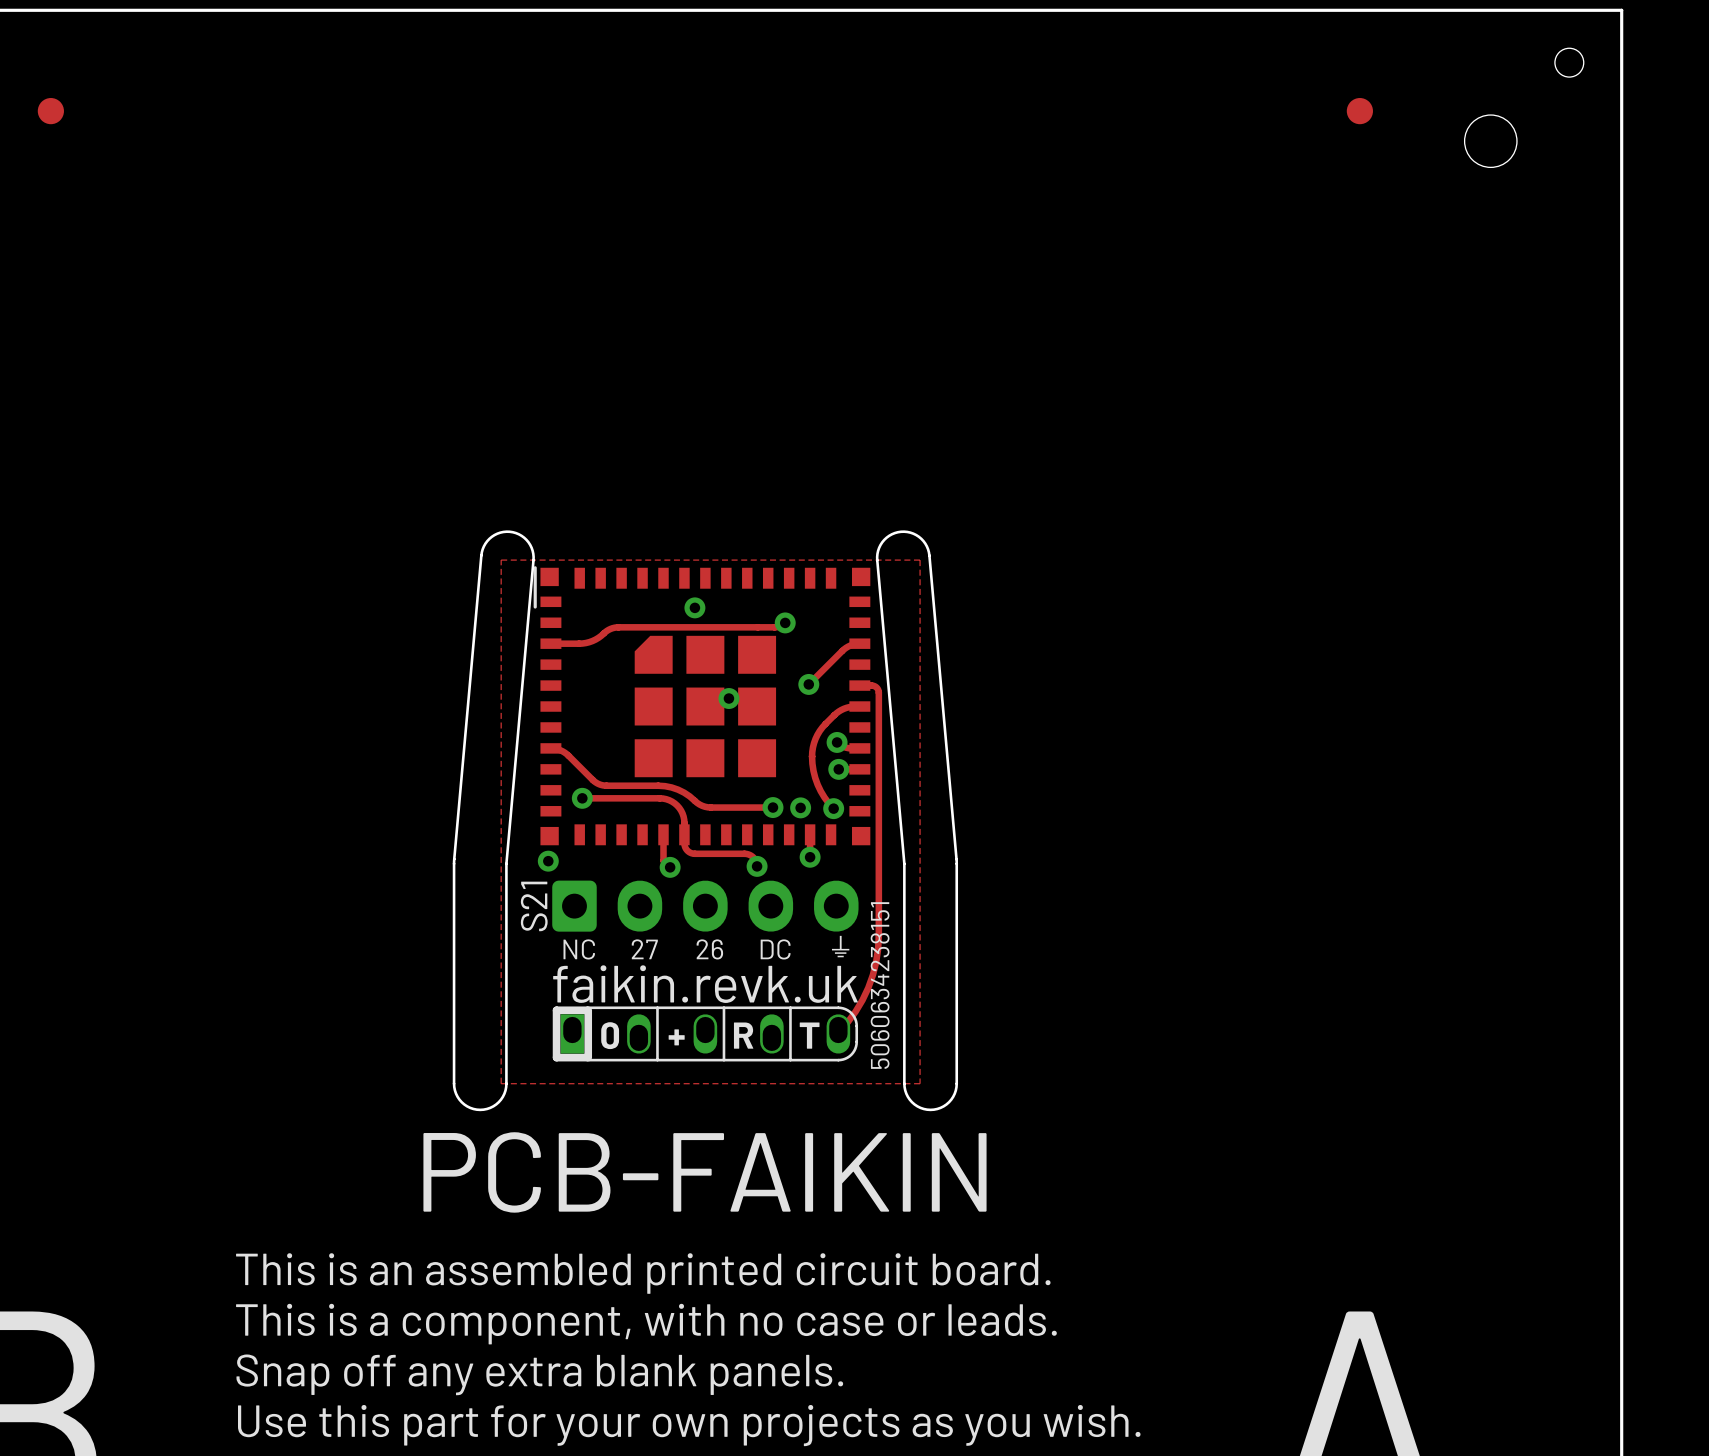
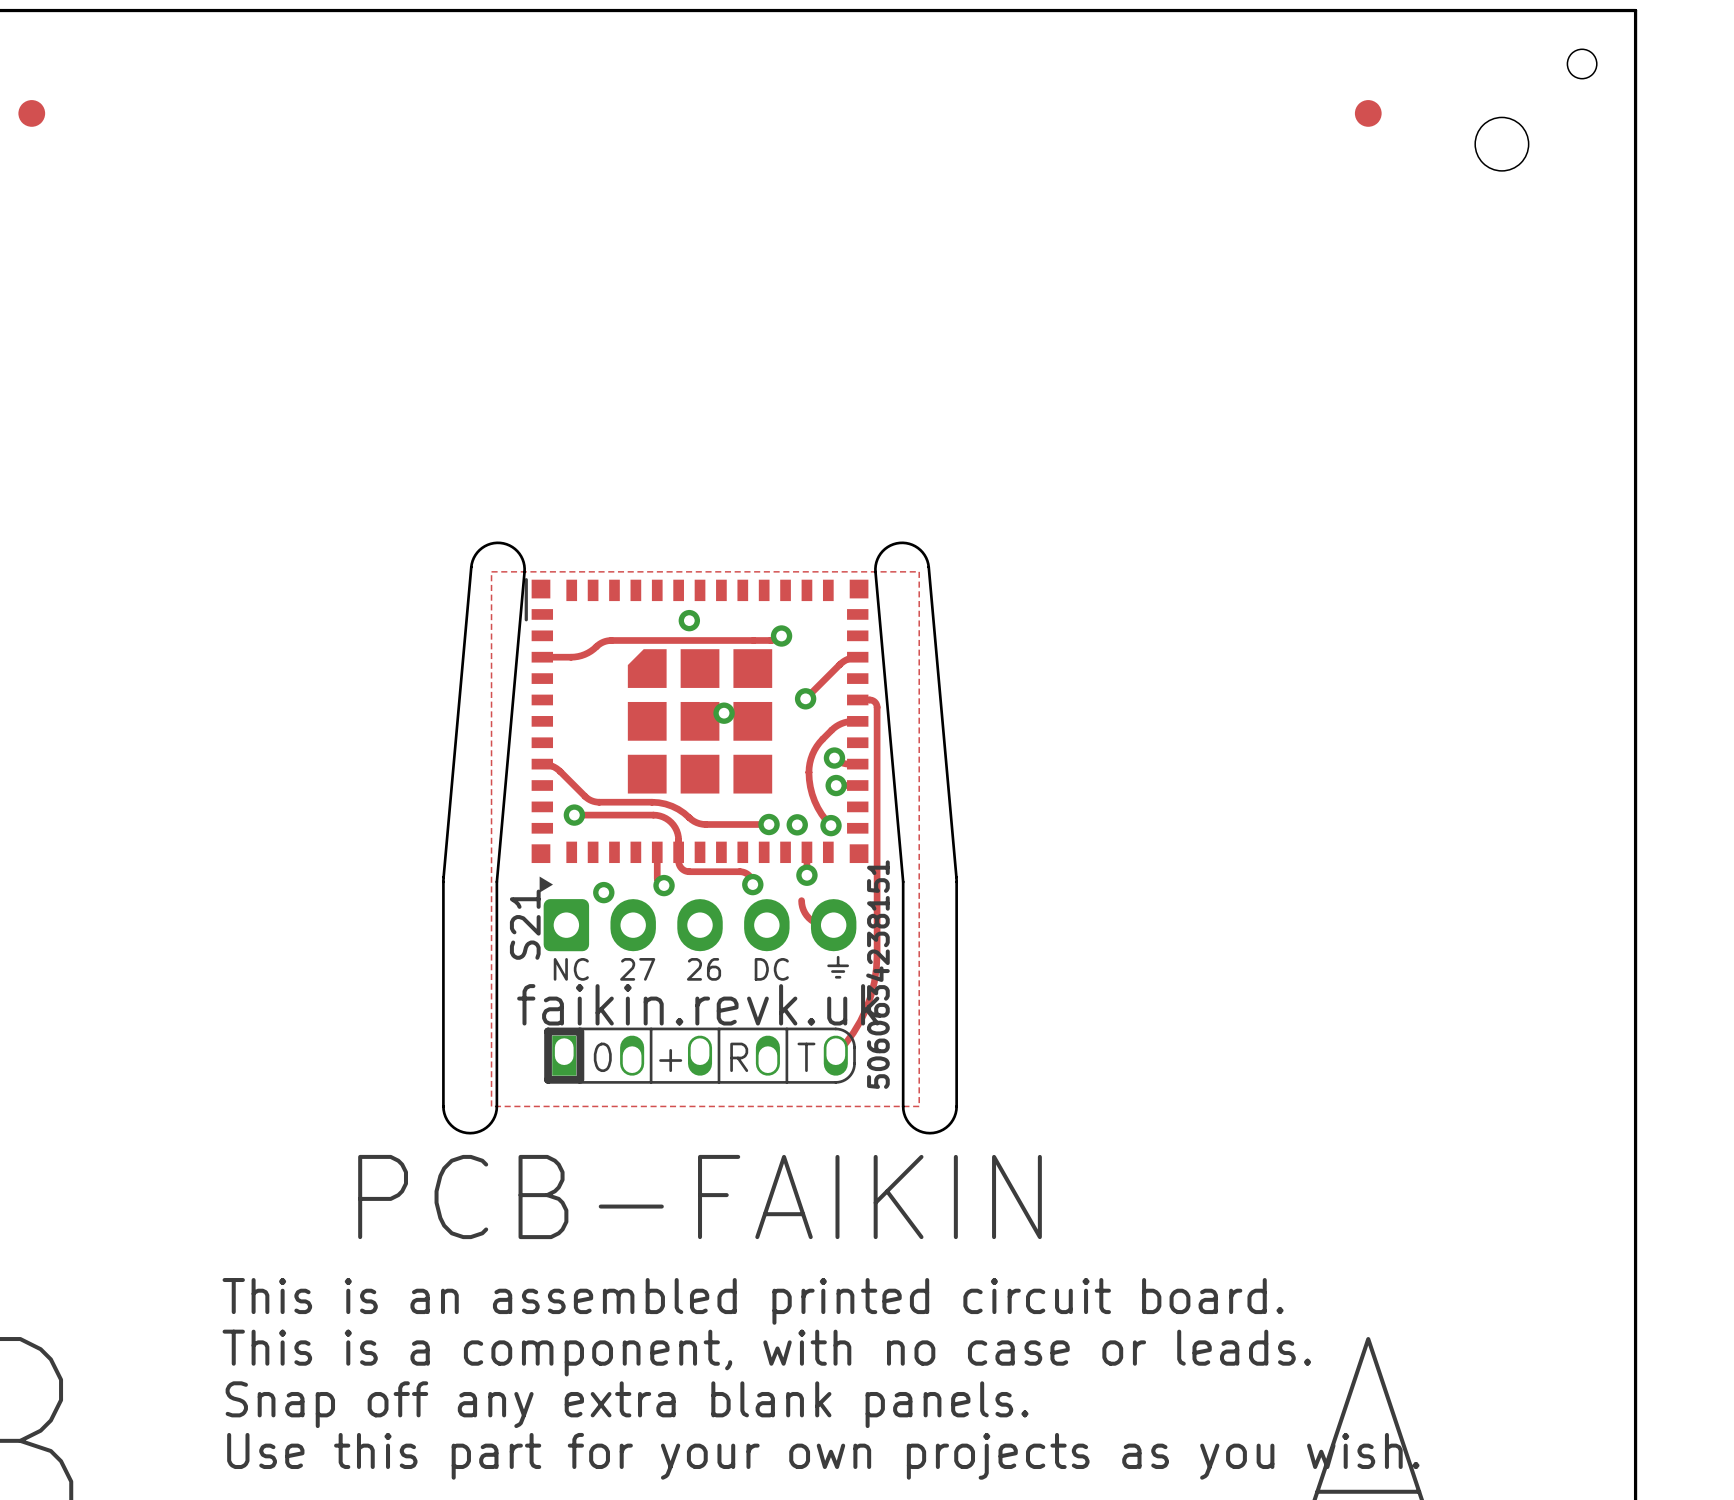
drawing: none -> [539, 876, 554, 893]
via position: (548, 861) -> (603, 892)
track: none -> (801, 900) (803, 910) (811, 920) (819, 924) (833, 925)

